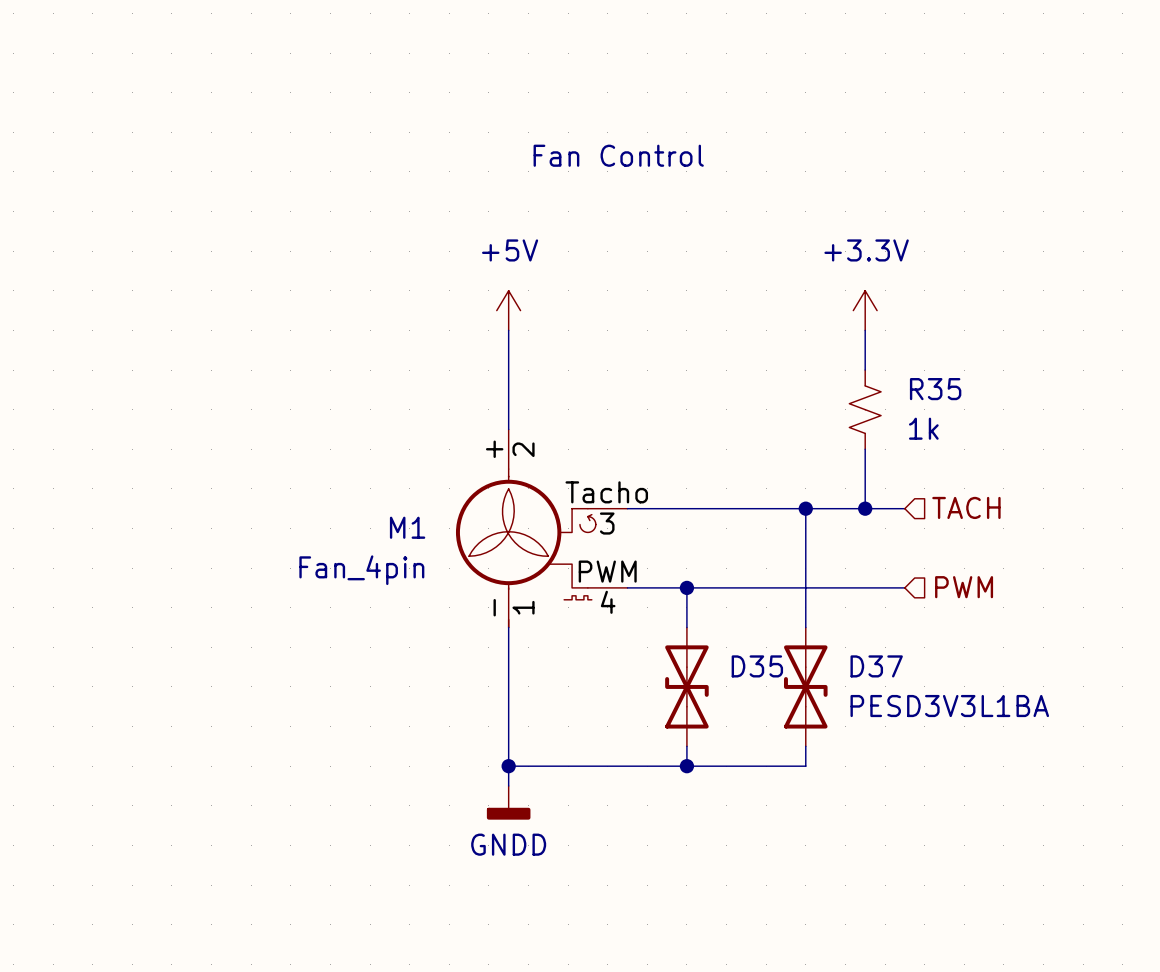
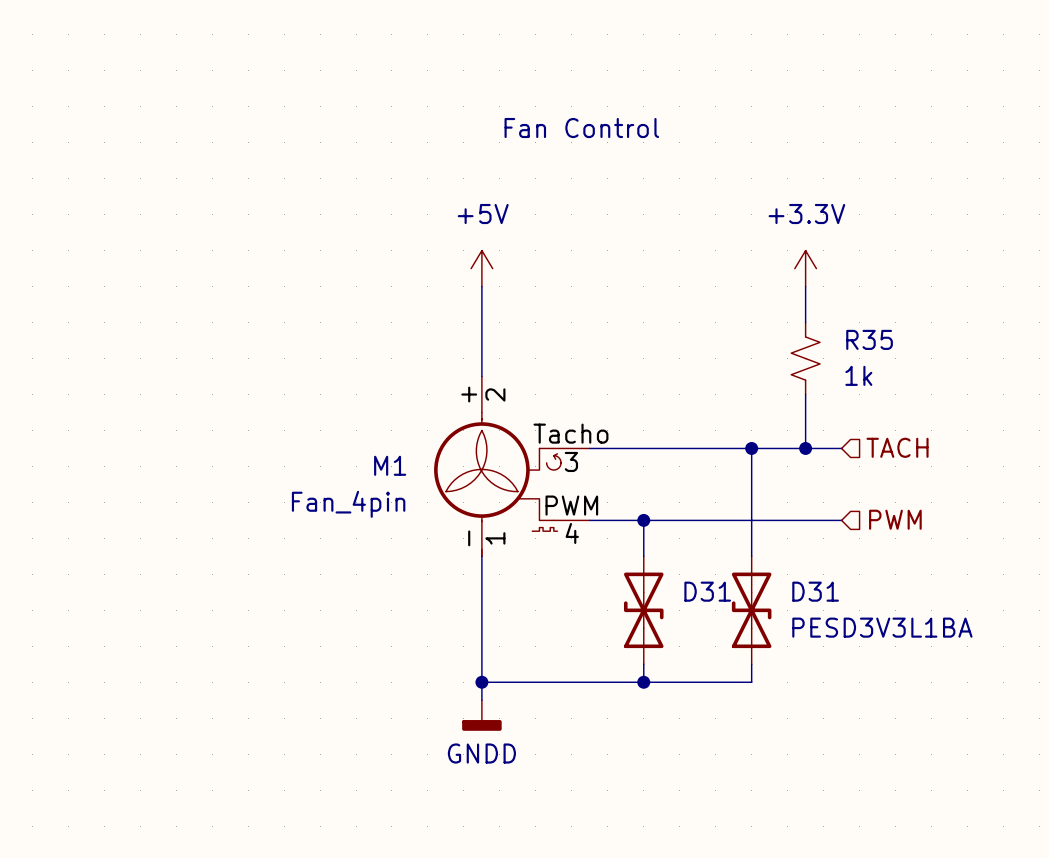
D35 name: D35 (757, 666) -> D31 (707, 591)
D37 name: D37 (876, 666) -> D31 (815, 591)

